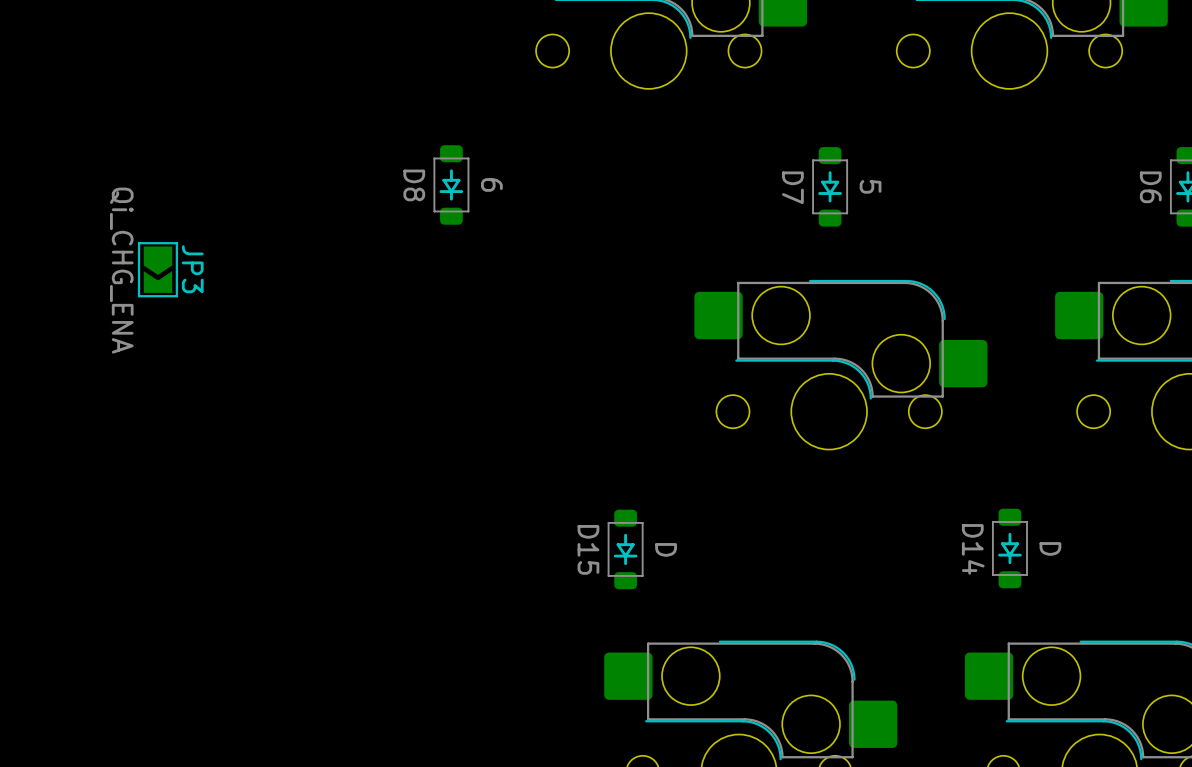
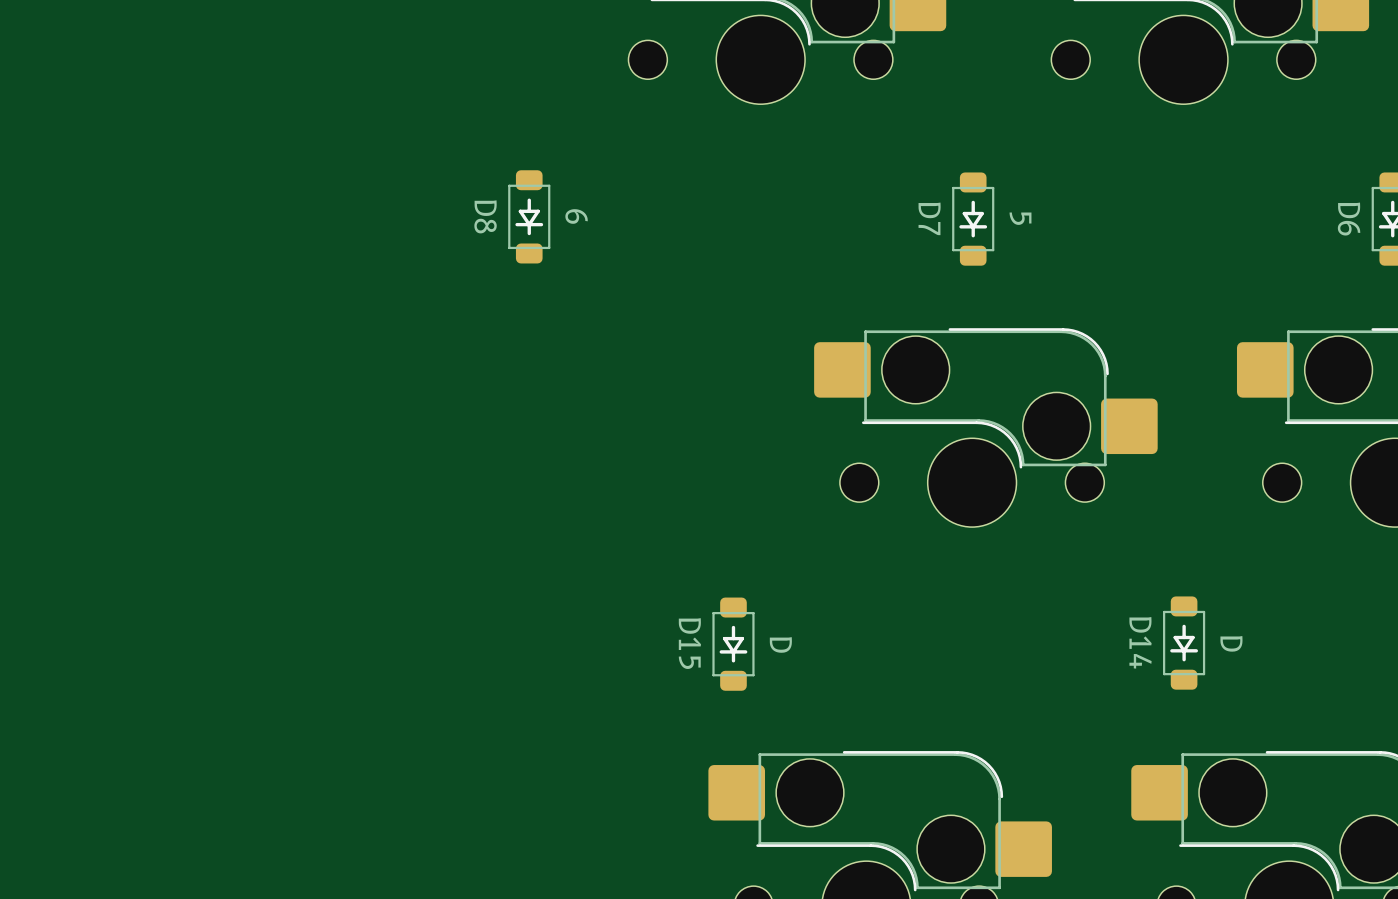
JP3: Qi_CHG_ENA (157, 269) -> none

